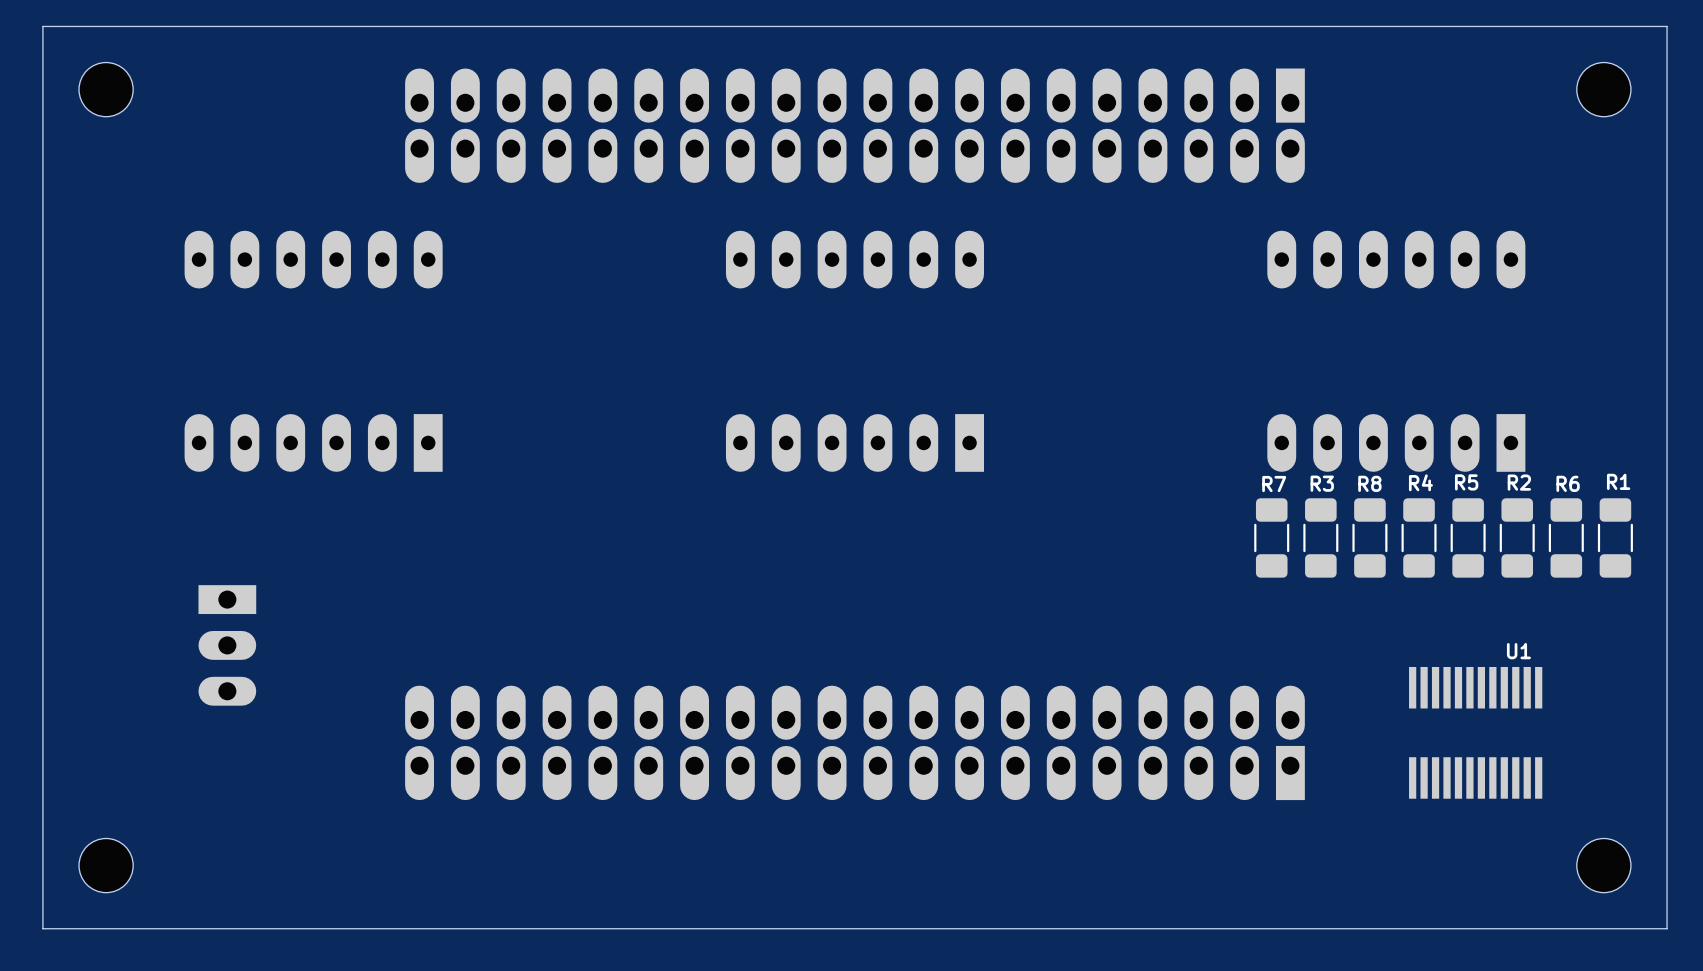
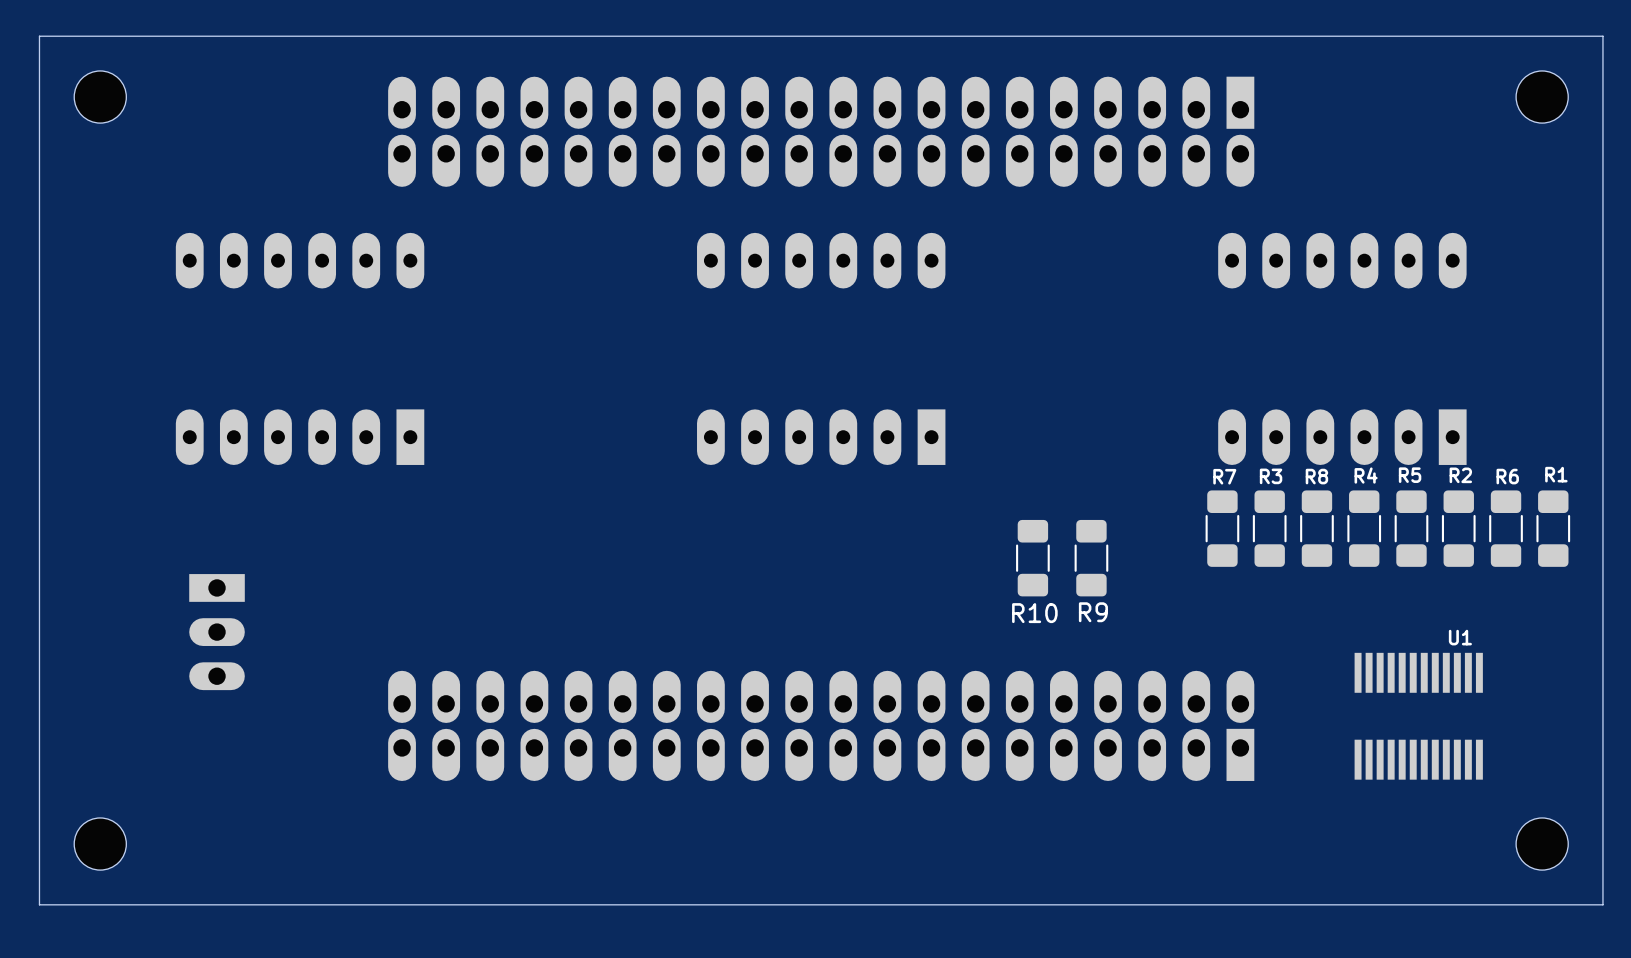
R10: none -> (1032, 558)
R9: none -> (1091, 558)

